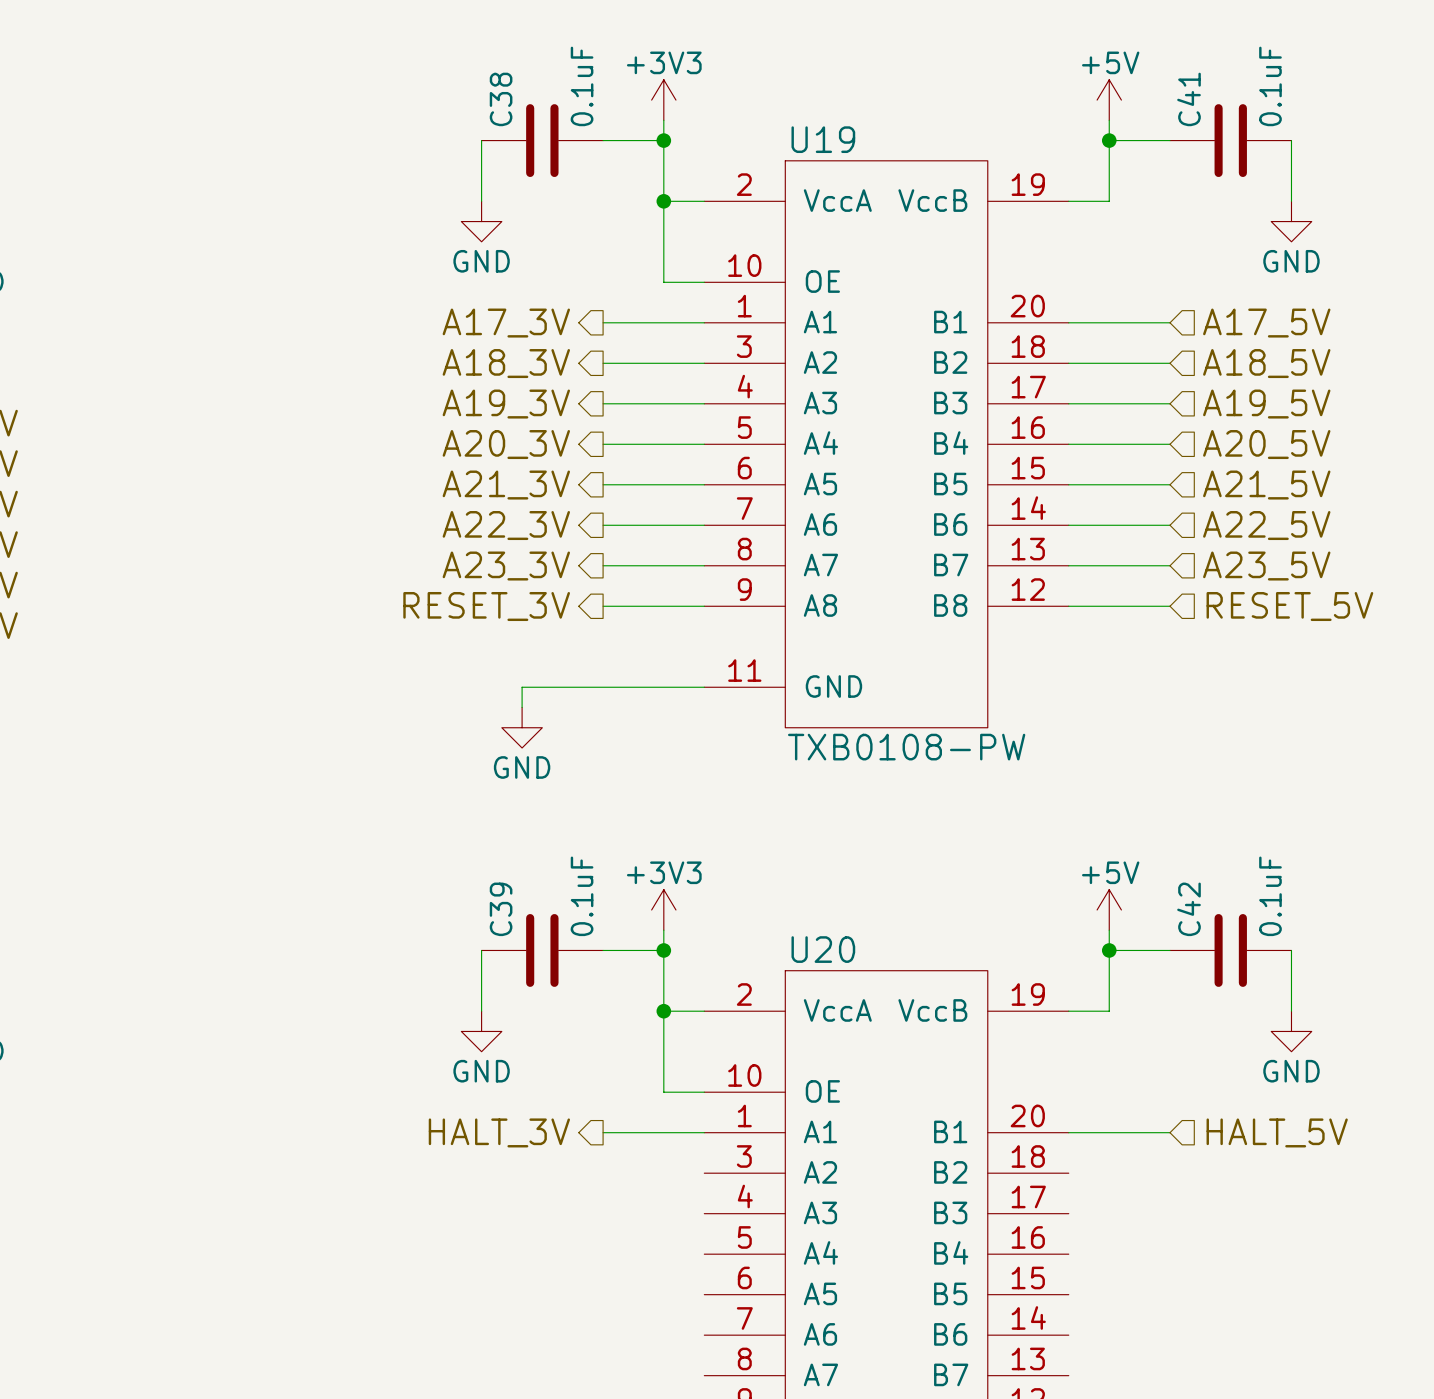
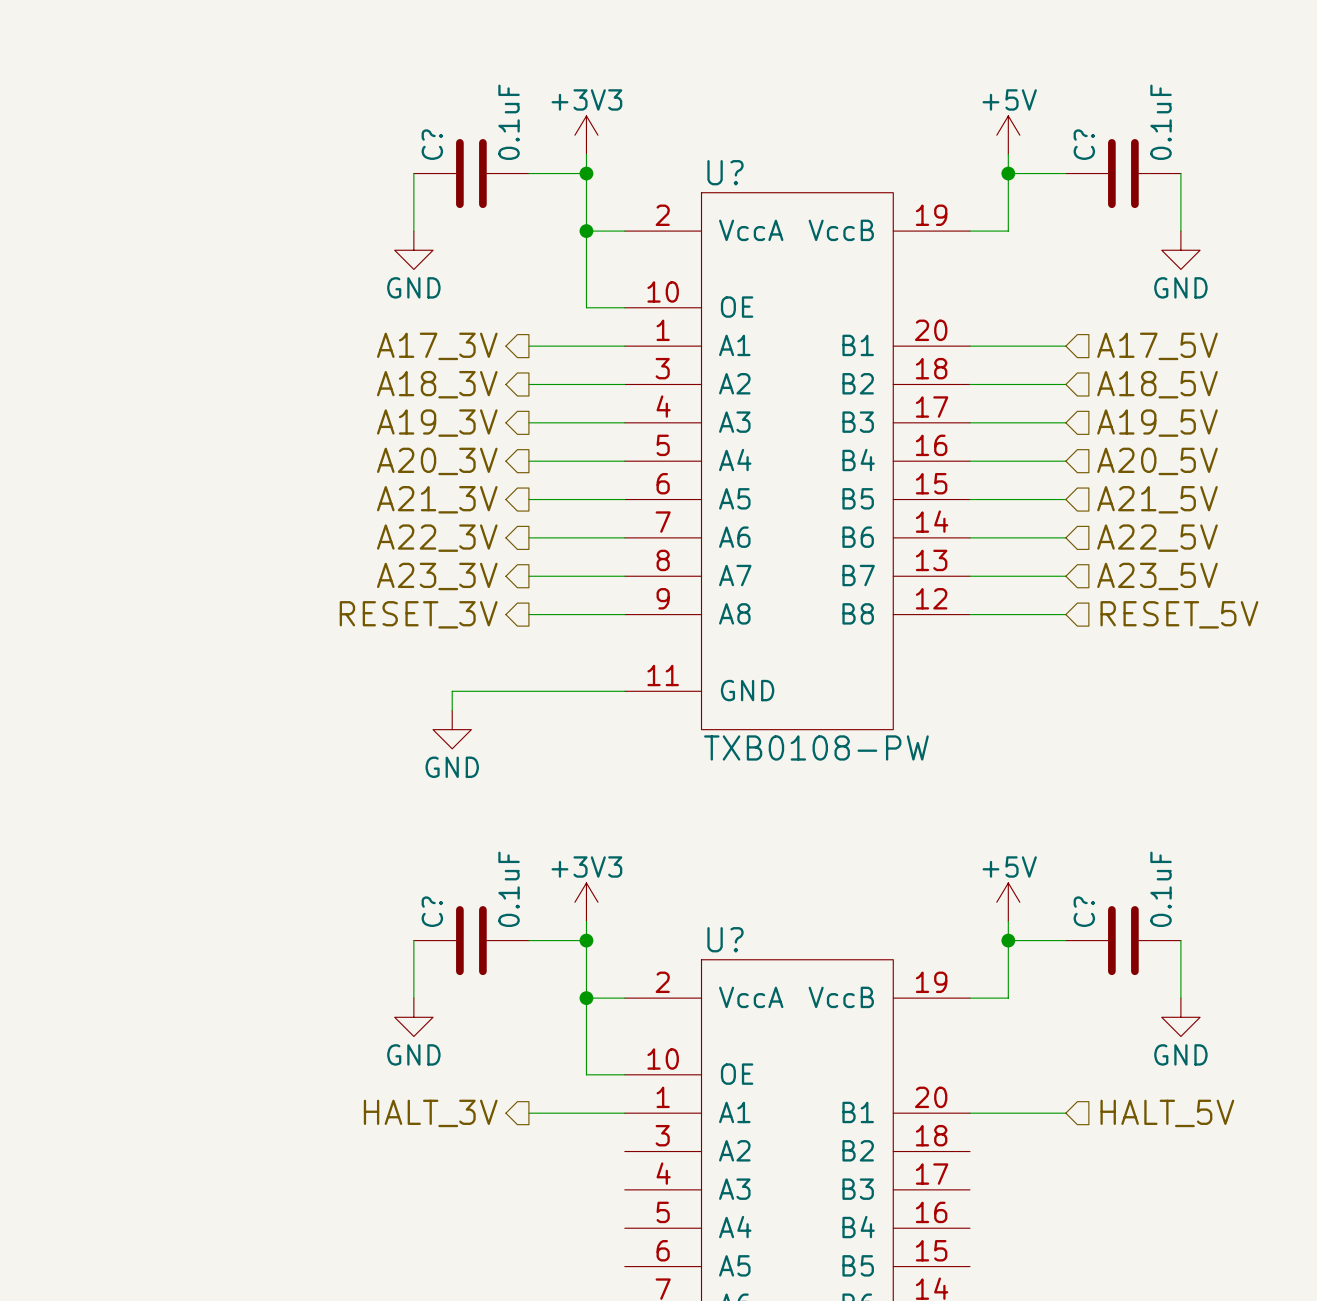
C38 name: C38 (501, 99) -> C? (432, 144)
C41 name: C41 (1189, 99) -> C? (1084, 144)
U19 name: U19 (823, 139) -> U? (725, 172)
C39 name: C39 (501, 909) -> C? (432, 911)
C42 name: C42 (1189, 909) -> C? (1084, 911)
U20 name: U20 (823, 949) -> U? (725, 939)

